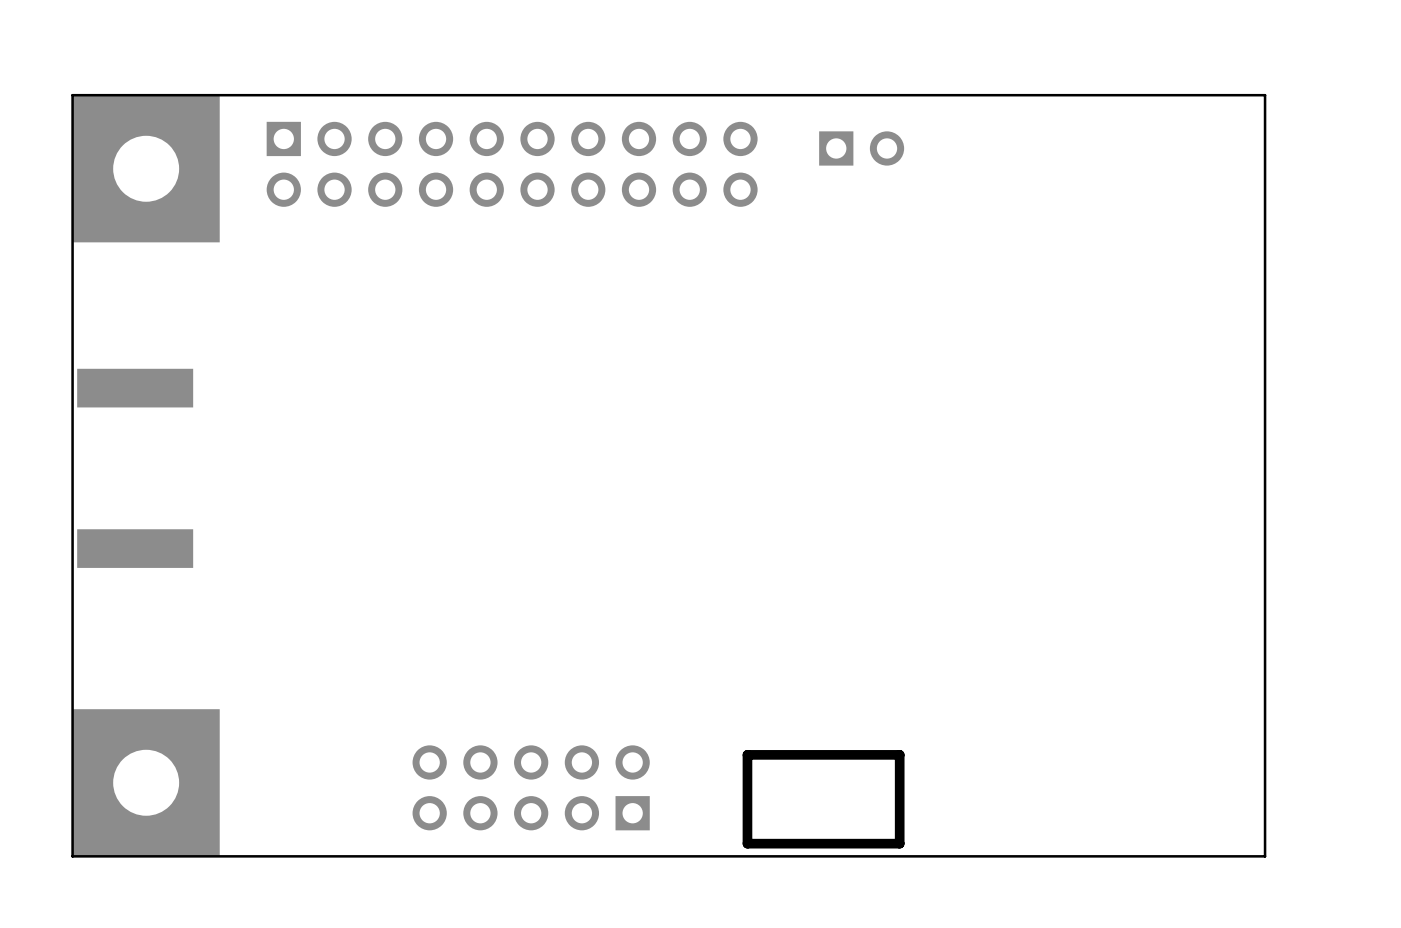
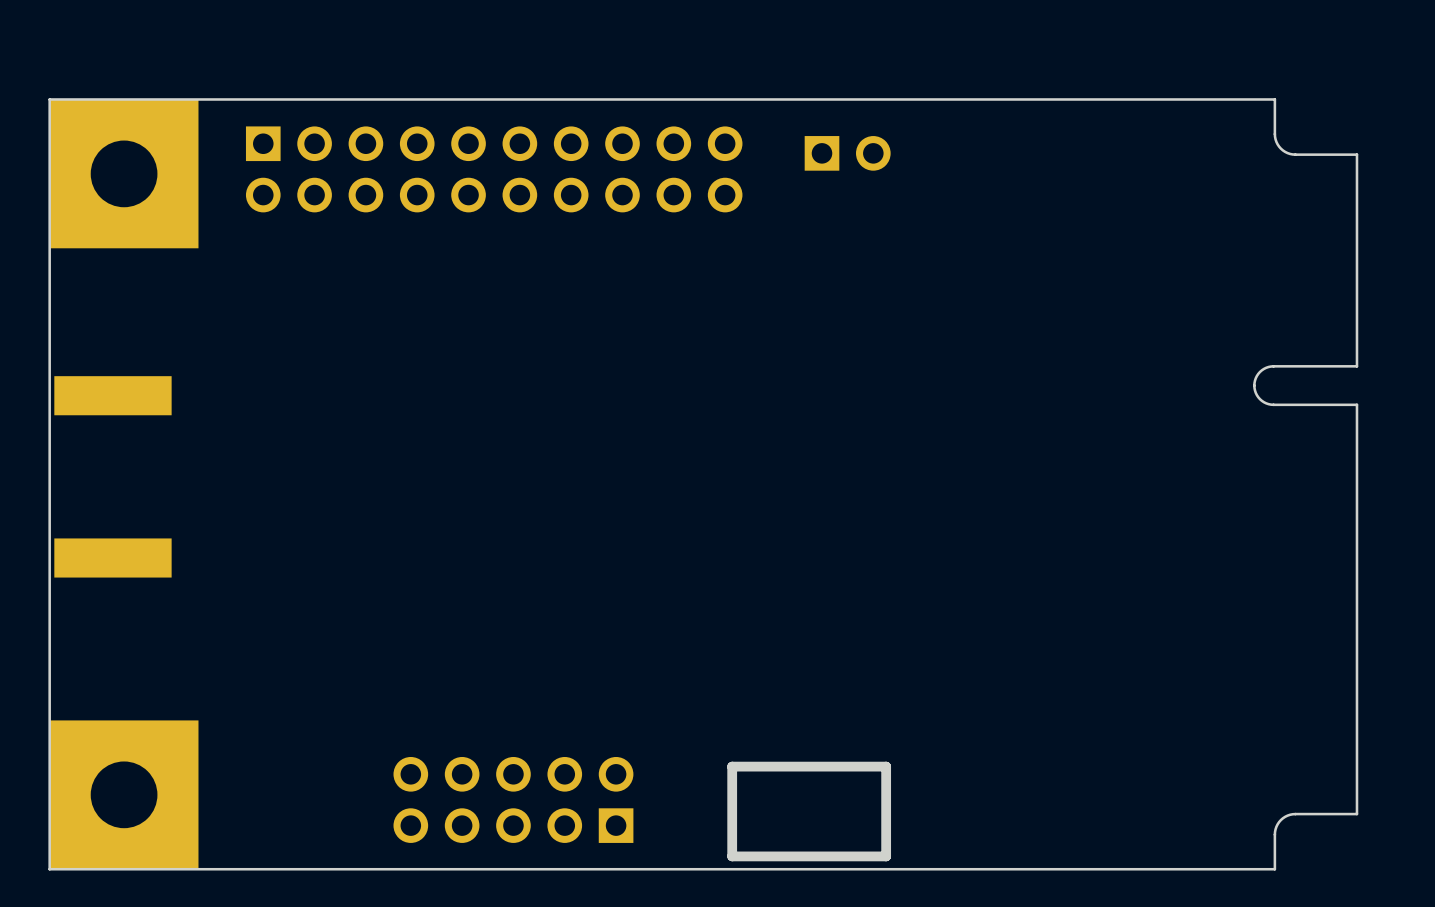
board edge: (1265, 95) (1265, 856) -> (1255, 99) (1274, 99) (1275, 136) (1279, 146) (1285, 151) (1295, 154) (1356, 154) (1356, 366) (1271, 366) (1258, 373) (1254, 385) (1258, 397) (1271, 404) (1356, 404) (1356, 814) (1295, 814) (1285, 816) (1279, 822) (1275, 831) (1274, 869) (1255, 869)

